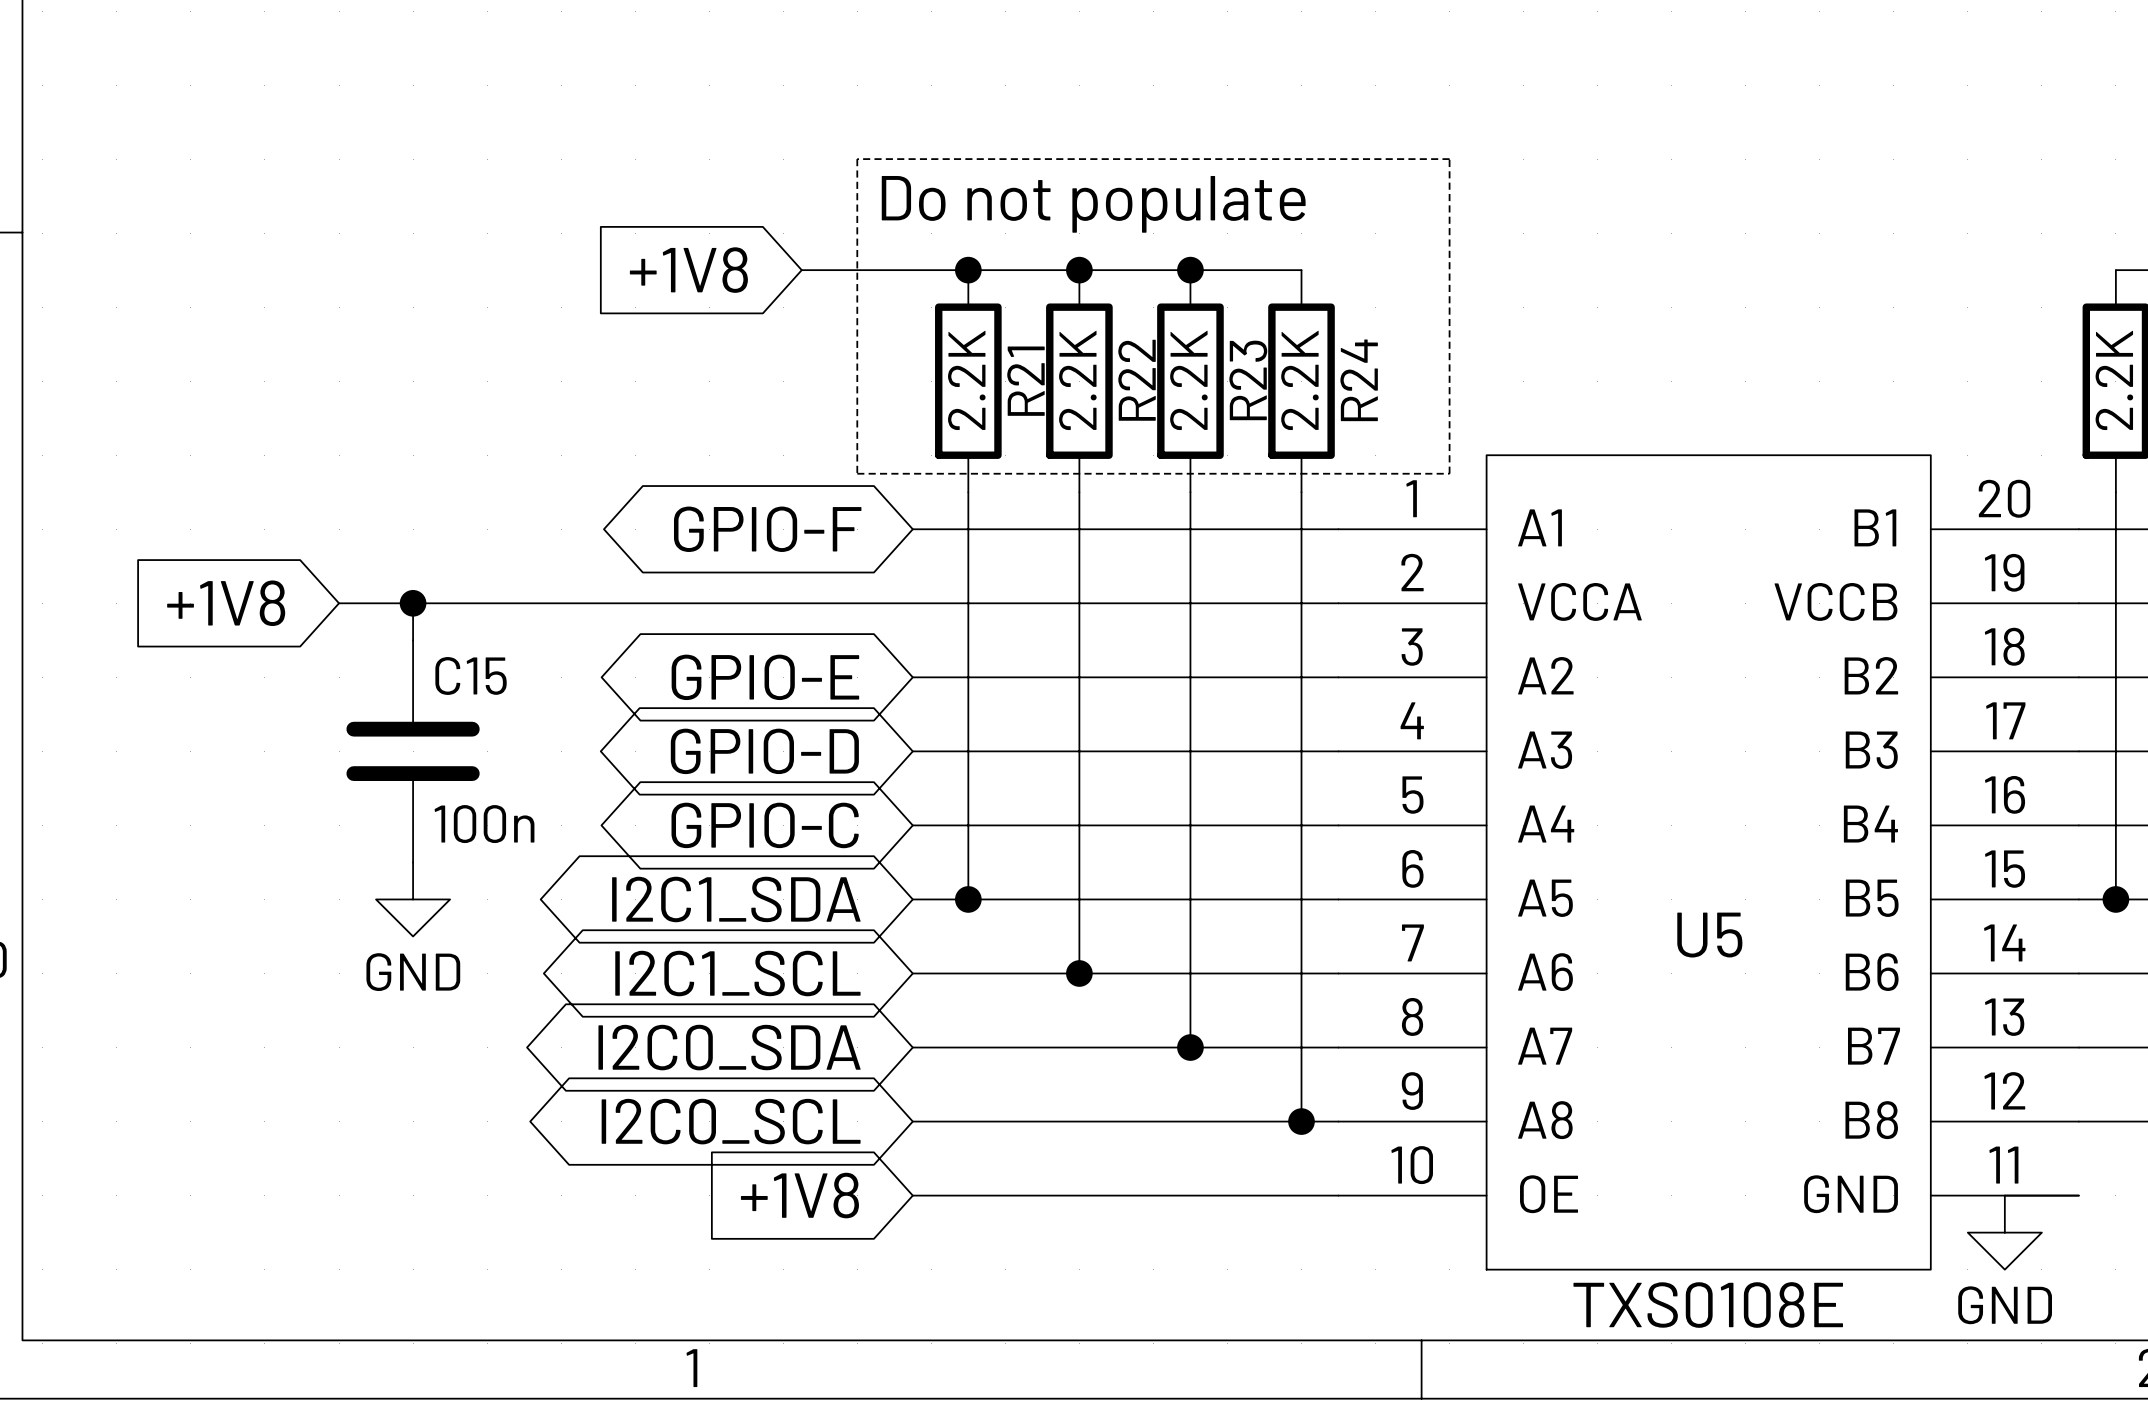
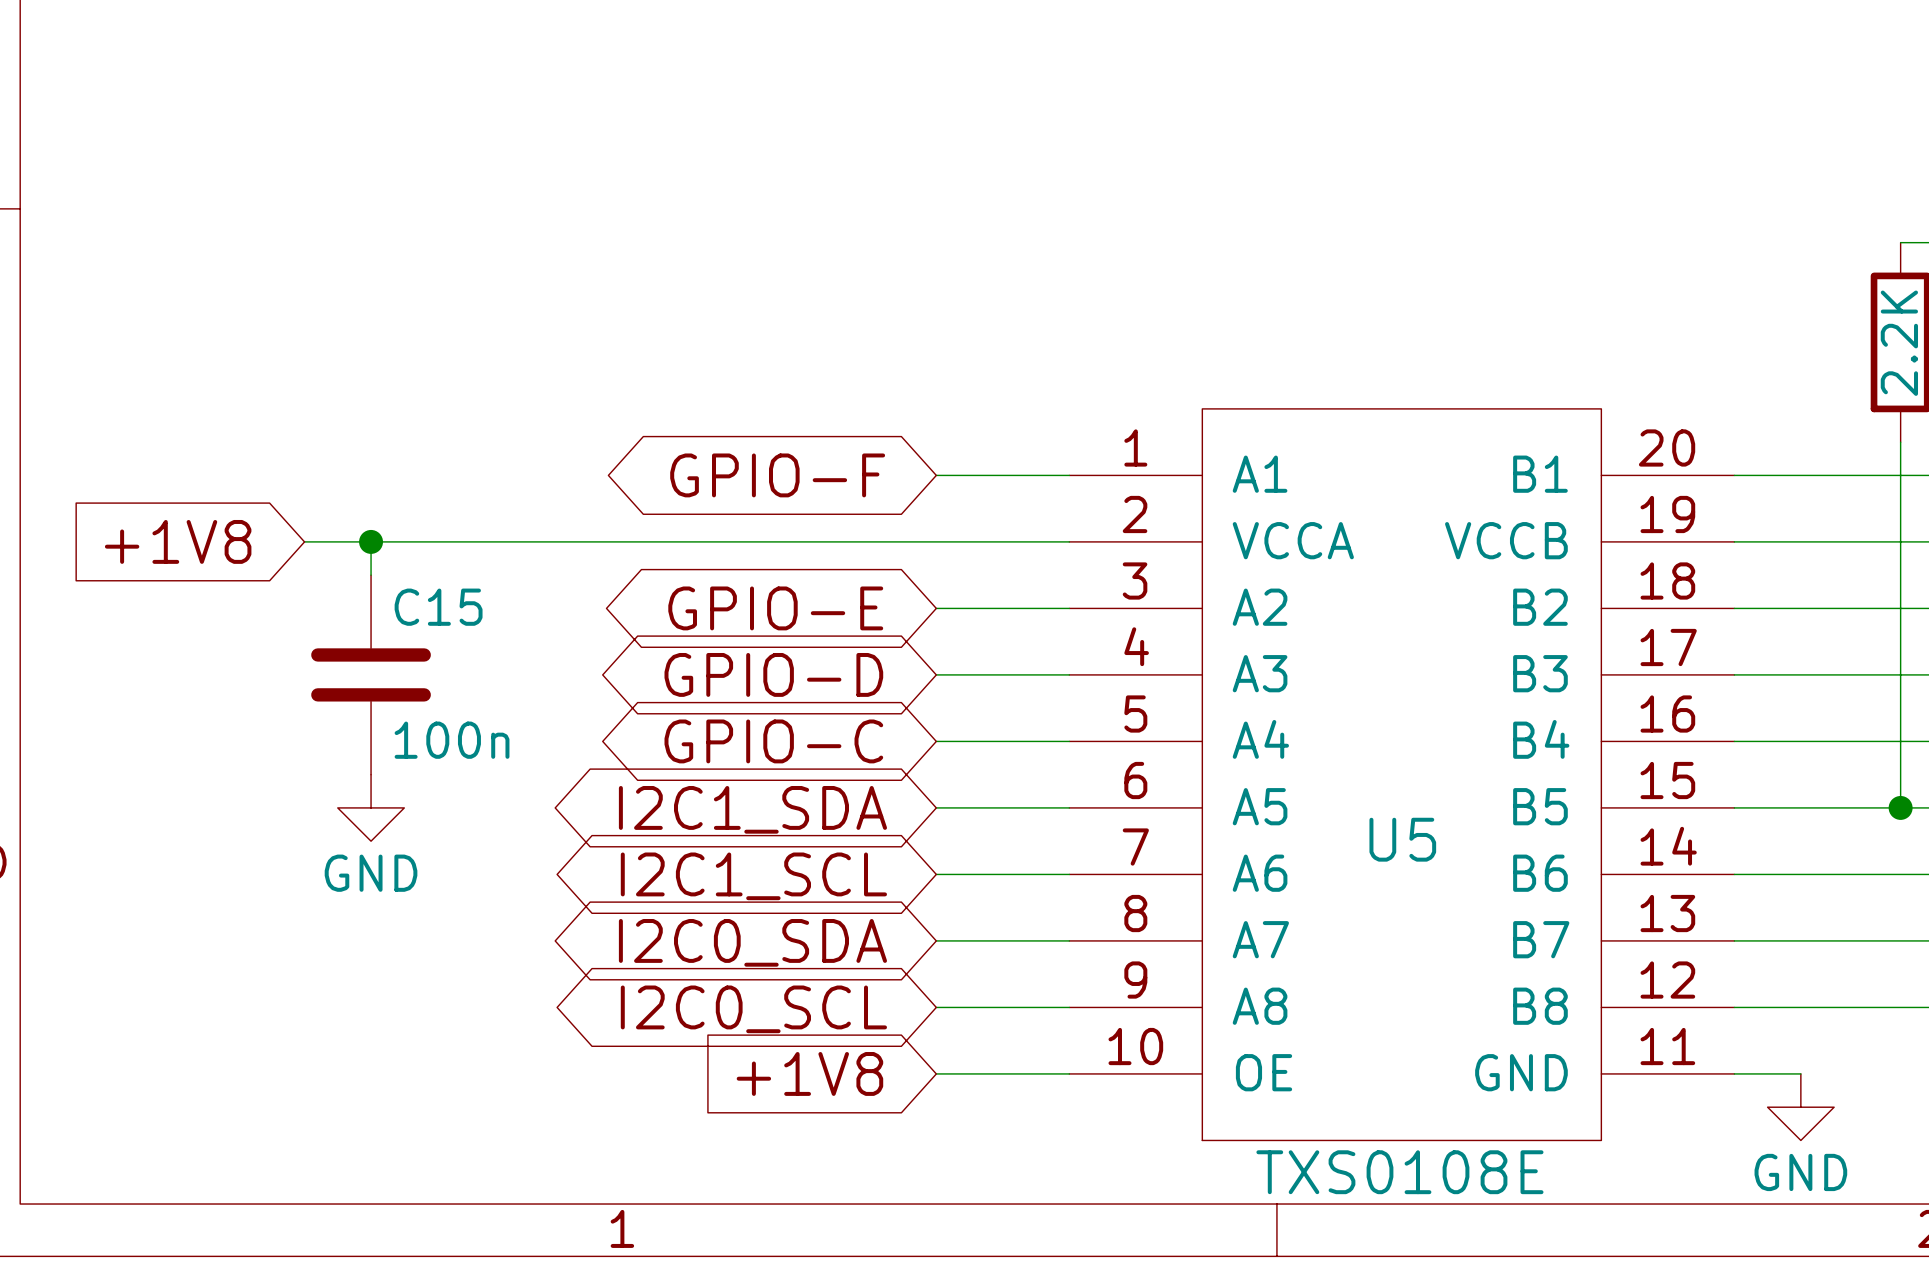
line: (857, 159) (1449, 159) (1449, 473) (857, 473) (857, 159) -> none
text: Do not populate (1093, 204) -> none
global label: +1V8 (688, 270) -> none
wire: (801, 270) (1301, 270) -> none
junction: (968, 270) -> none
junction: (1079, 270) -> none
junction: (1190, 270) -> none
R21: 2.2K (968, 381) -> none
R22: 2.2K (1079, 381) -> none
R23: 2.2K (1190, 381) -> none
R24: 2.2K (1301, 381) -> none
wire: (968, 492) (968, 899) -> none
wire: (1079, 492) (1079, 973) -> none
wire: (1190, 492) (1190, 1047) (1338, 1047) -> none
wire: (1301, 492) (1301, 1121) -> none
global label position: GPIO-F (767, 529) -> GPIO-F (777, 475)
wire: (912, 529) (1042, 529) -> none
global label position: GPIO-E (765, 677) -> GPIO-E (775, 608)
wire: (912, 677) (1042, 677) -> none
global label position: GPIO-D (764, 751) -> GPIO-D (773, 674)
wire: (912, 751) (1042, 751) -> none
global label position: GPIO-C (765, 825) -> GPIO-C (773, 741)
wire: (912, 825) (1042, 825) -> none
U5 position: (1708, 862) -> (1401, 774)
global label position: I2C1_SDA (736, 899) -> I2C1_SDA (752, 809)
wire: (912, 899) (1042, 899) -> none
junction: (968, 899) -> none
global label position: I2C1_SCL (737, 973) -> I2C1_SCL (753, 876)
wire: (912, 973) (1042, 973) -> none
junction: (1079, 973) -> none
global label position: I2C0_SDA (729, 1047) -> I2C0_SDA (752, 942)
wire: (912, 1047) (1042, 1047) -> none
junction: (1190, 1047) -> none
global label position: I2C0_SCL (731, 1121) -> I2C0_SCL (753, 1009)
wire: (912, 1121) (1042, 1121) -> none
junction: (1301, 1121) -> none
global label position: +1V8 (799, 1195) -> +1V8 (809, 1073)
wire: (912, 1195) (1042, 1195) -> none

